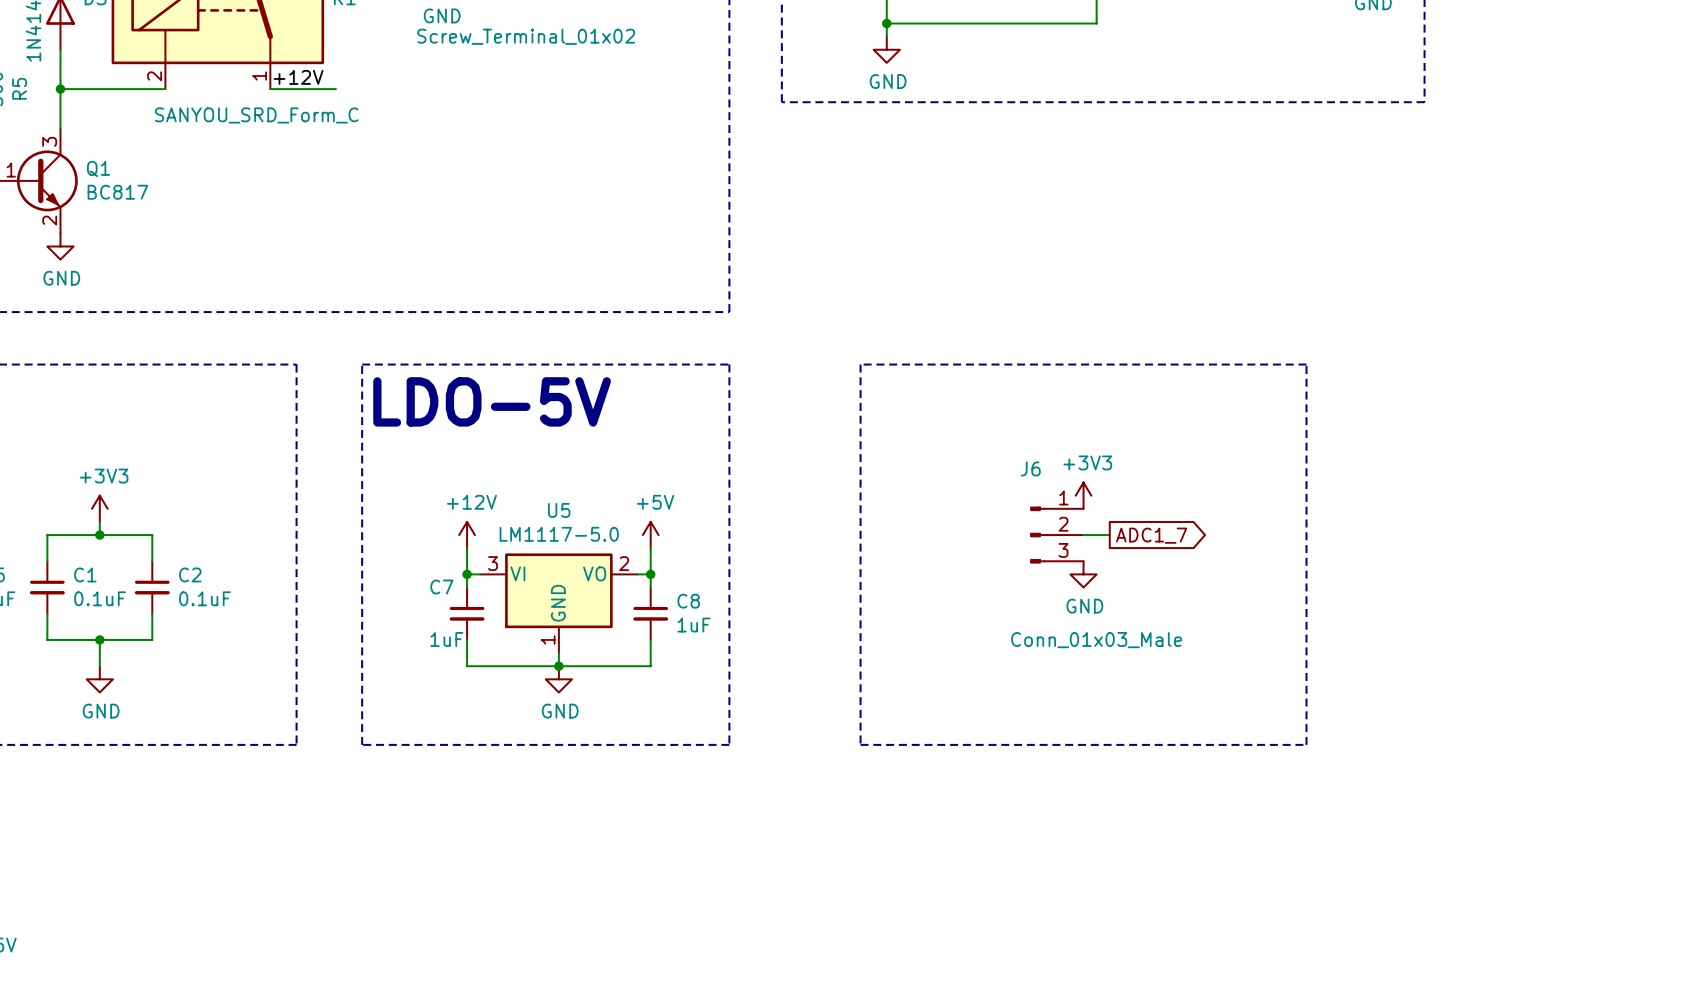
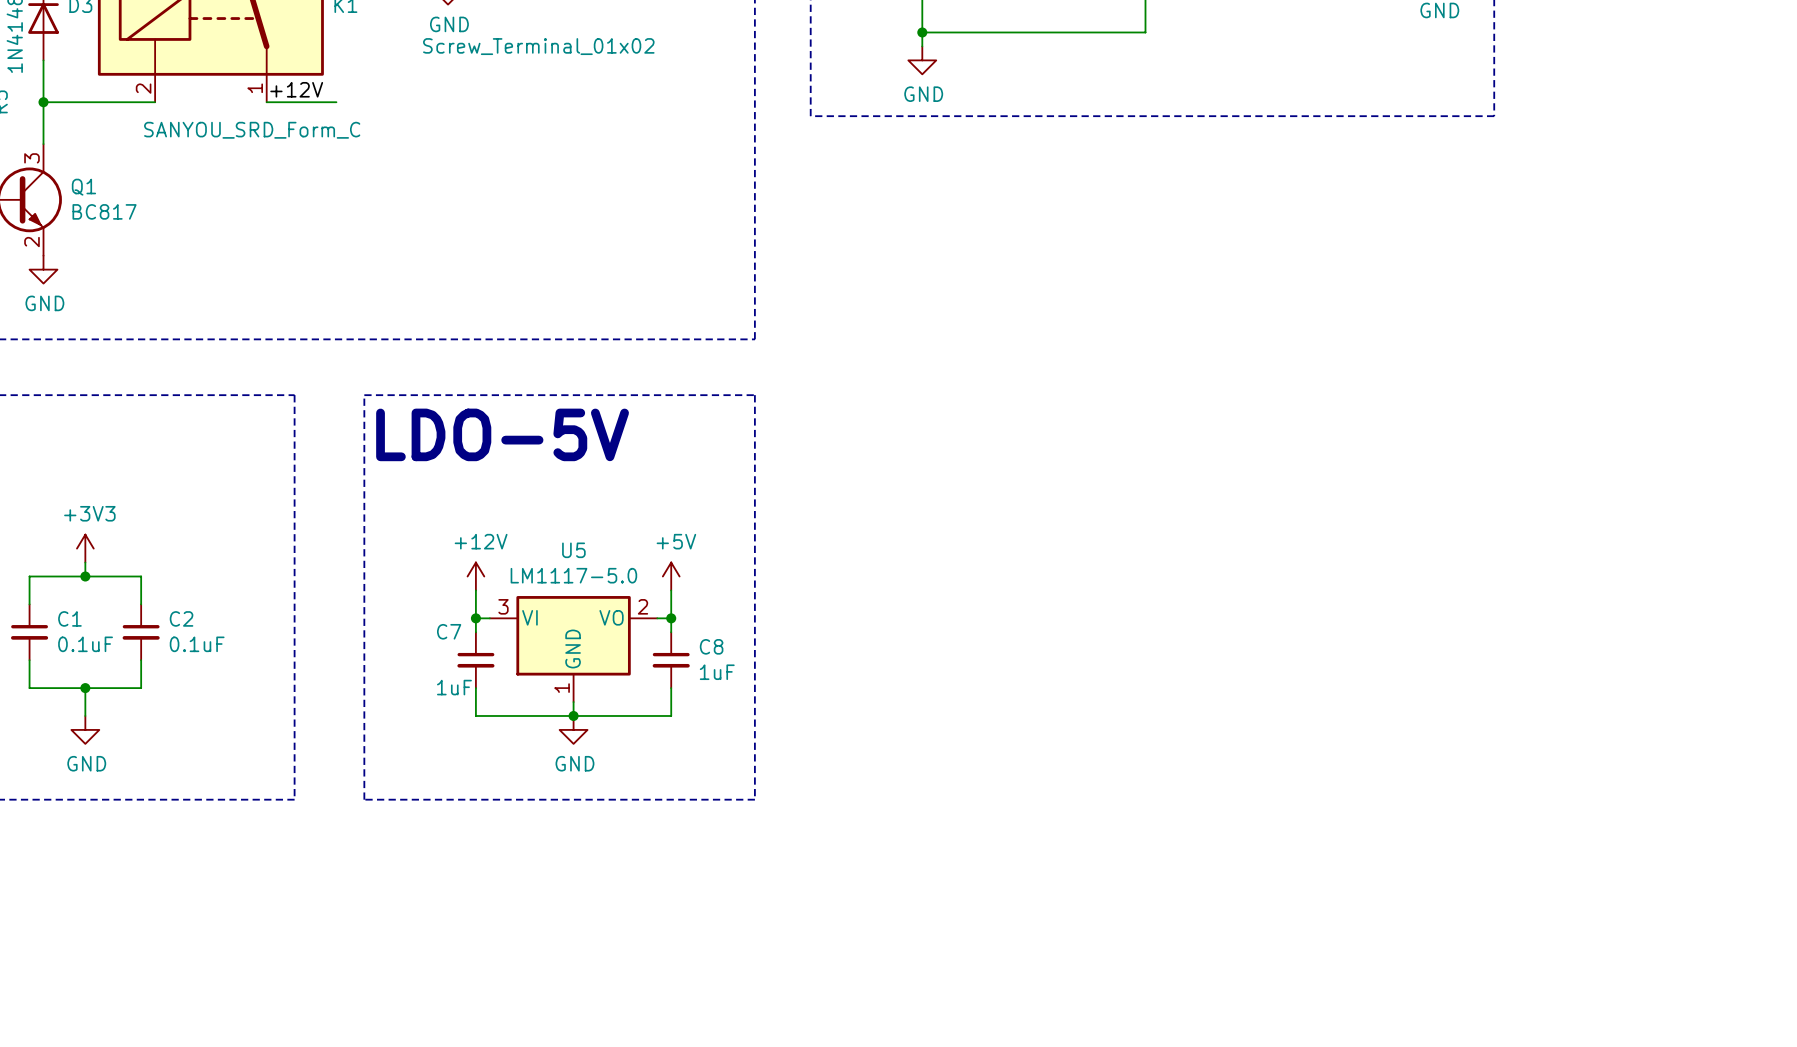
line: (860, 364) (860, 744) (1306, 744) (1306, 364) (860, 364) -> none
power symbol: +3V3 (1083, 495) -> none
J6: Conn_01x03_Male (1056, 535) -> none
wire: (1083, 535) (1109, 535) -> none
global label: ADC1_7 (1151, 535) -> none
power symbol: GND (1083, 574) -> none

